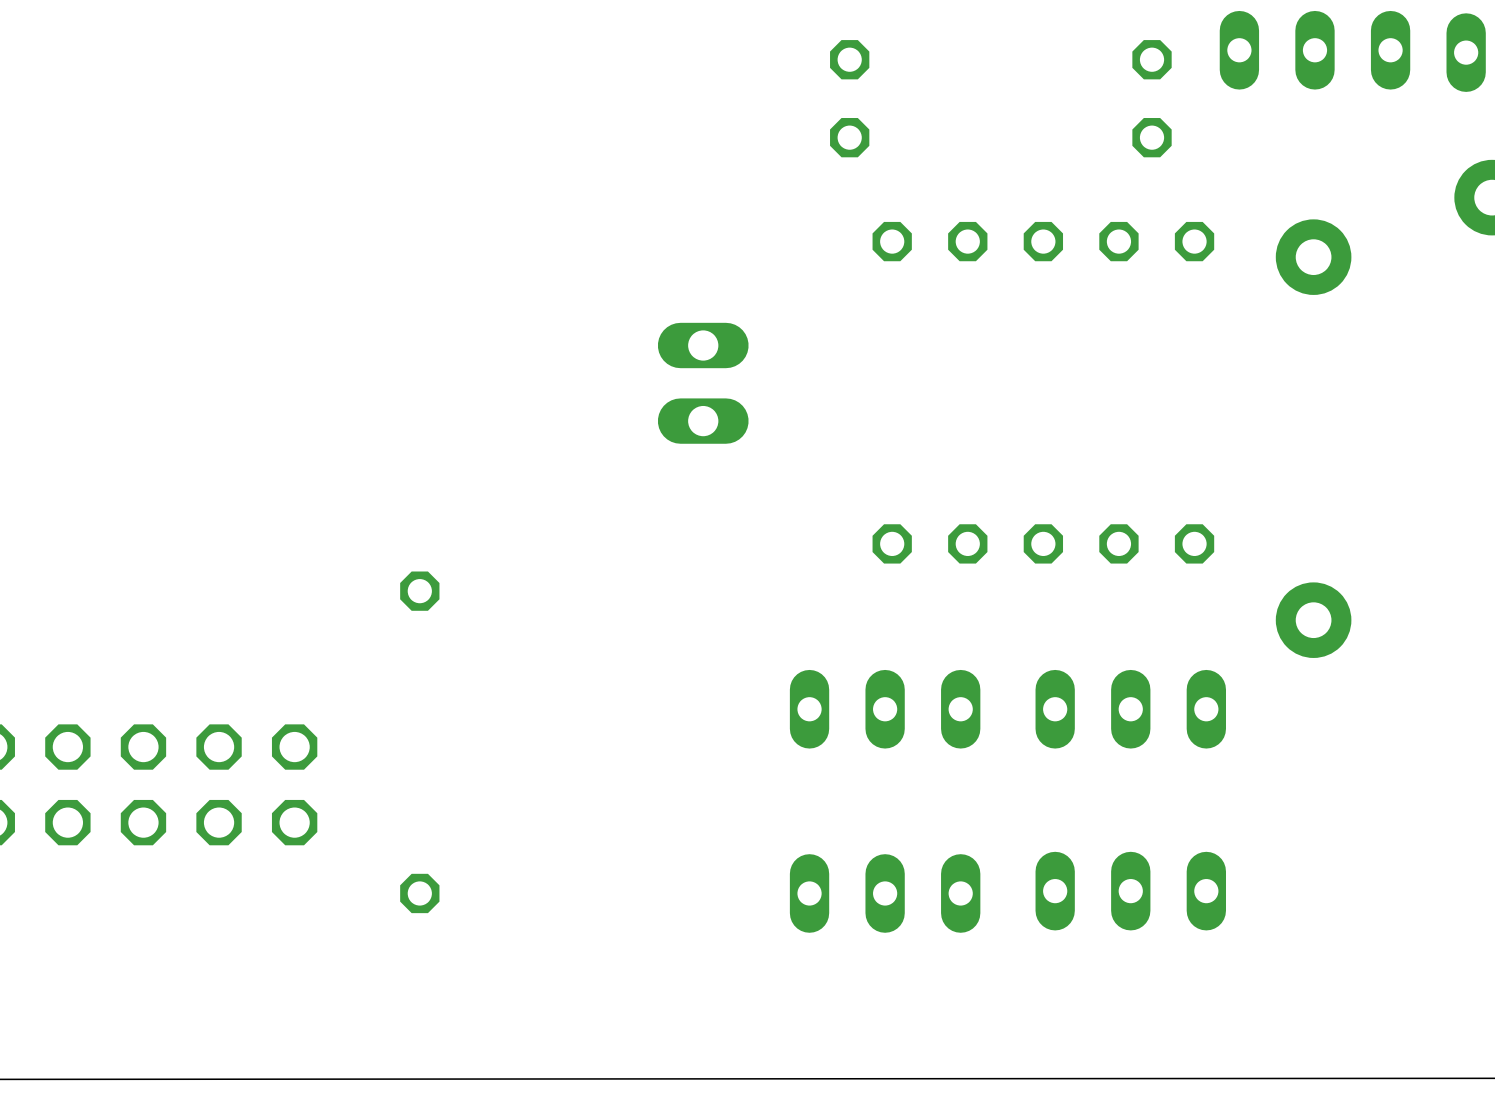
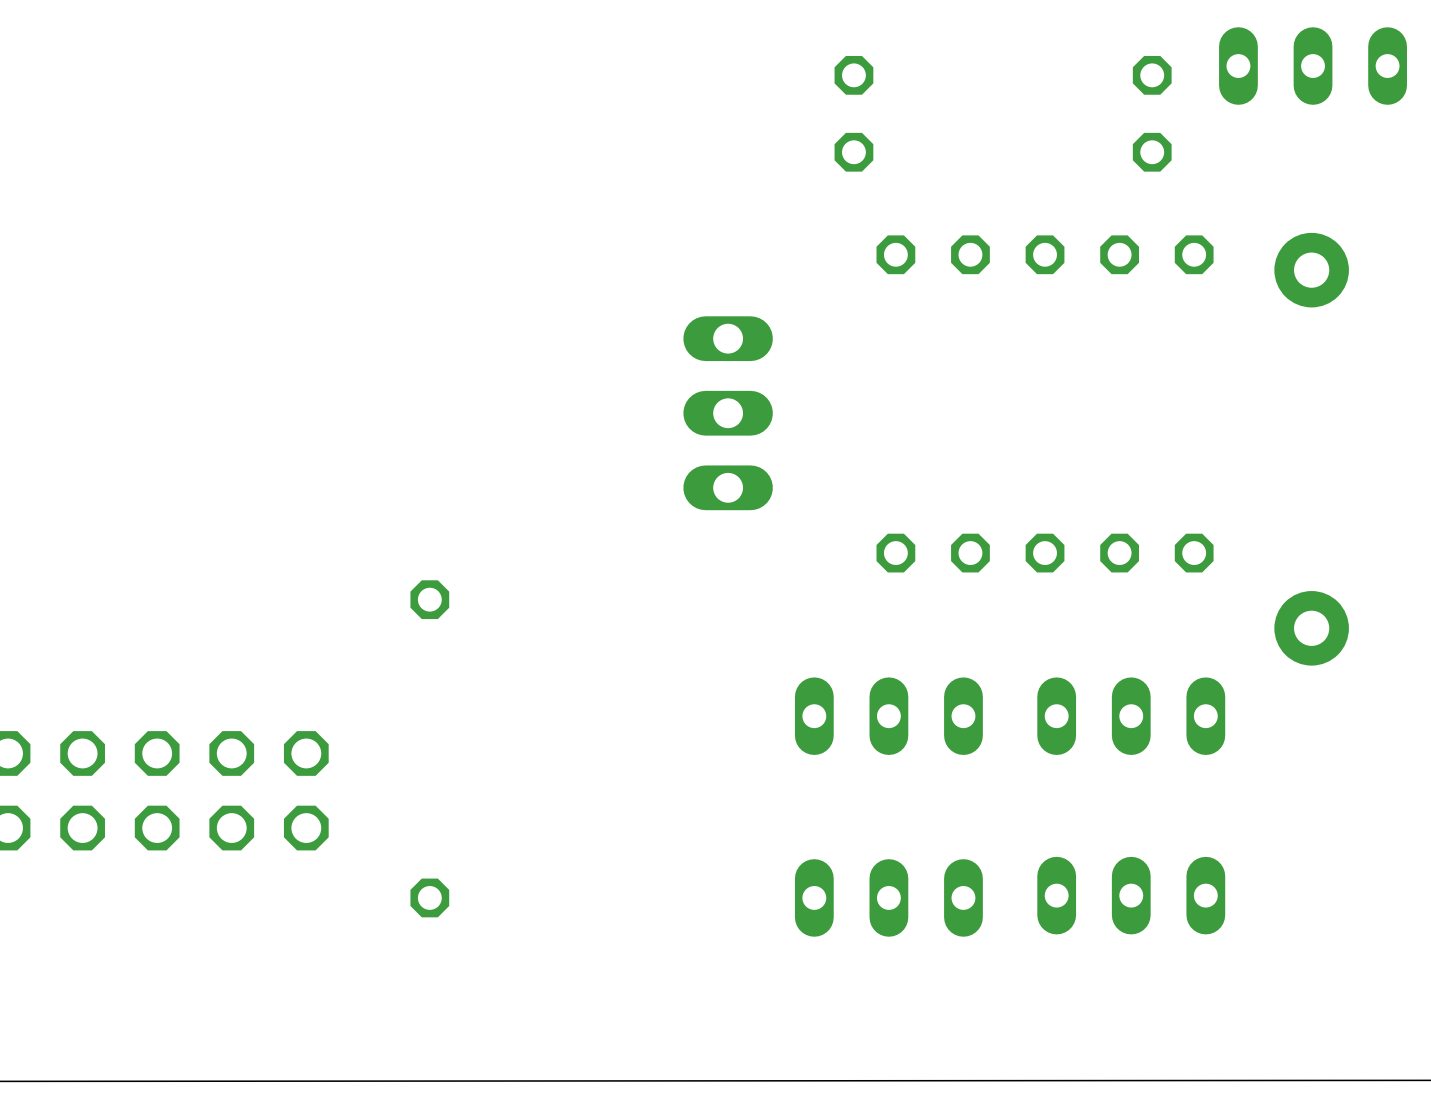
part footprint: [657, 322, 749, 444] -> [683, 316, 773, 511]

